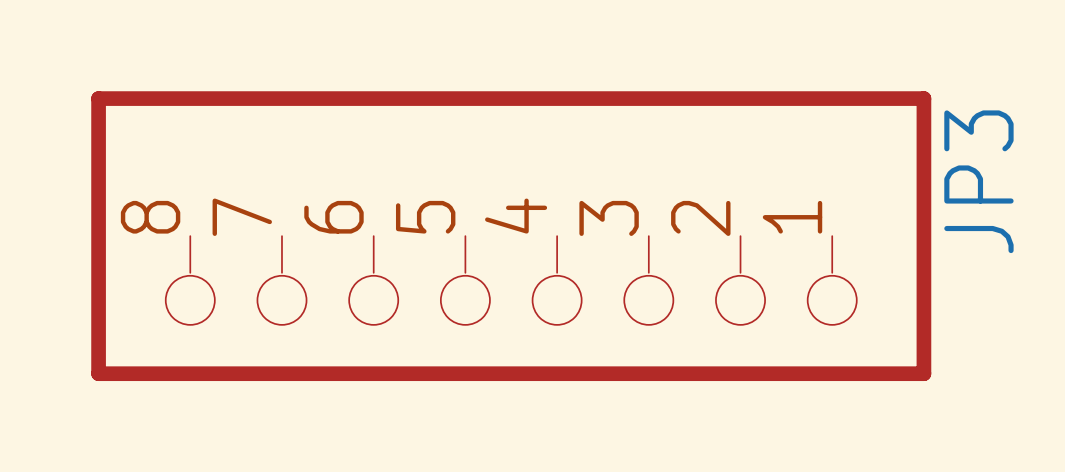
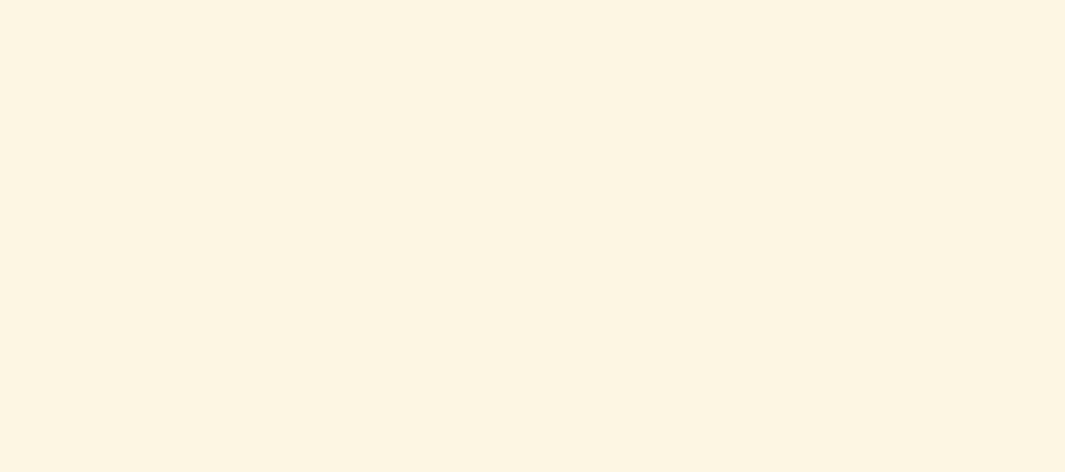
JP3: (511, 236) -> none

